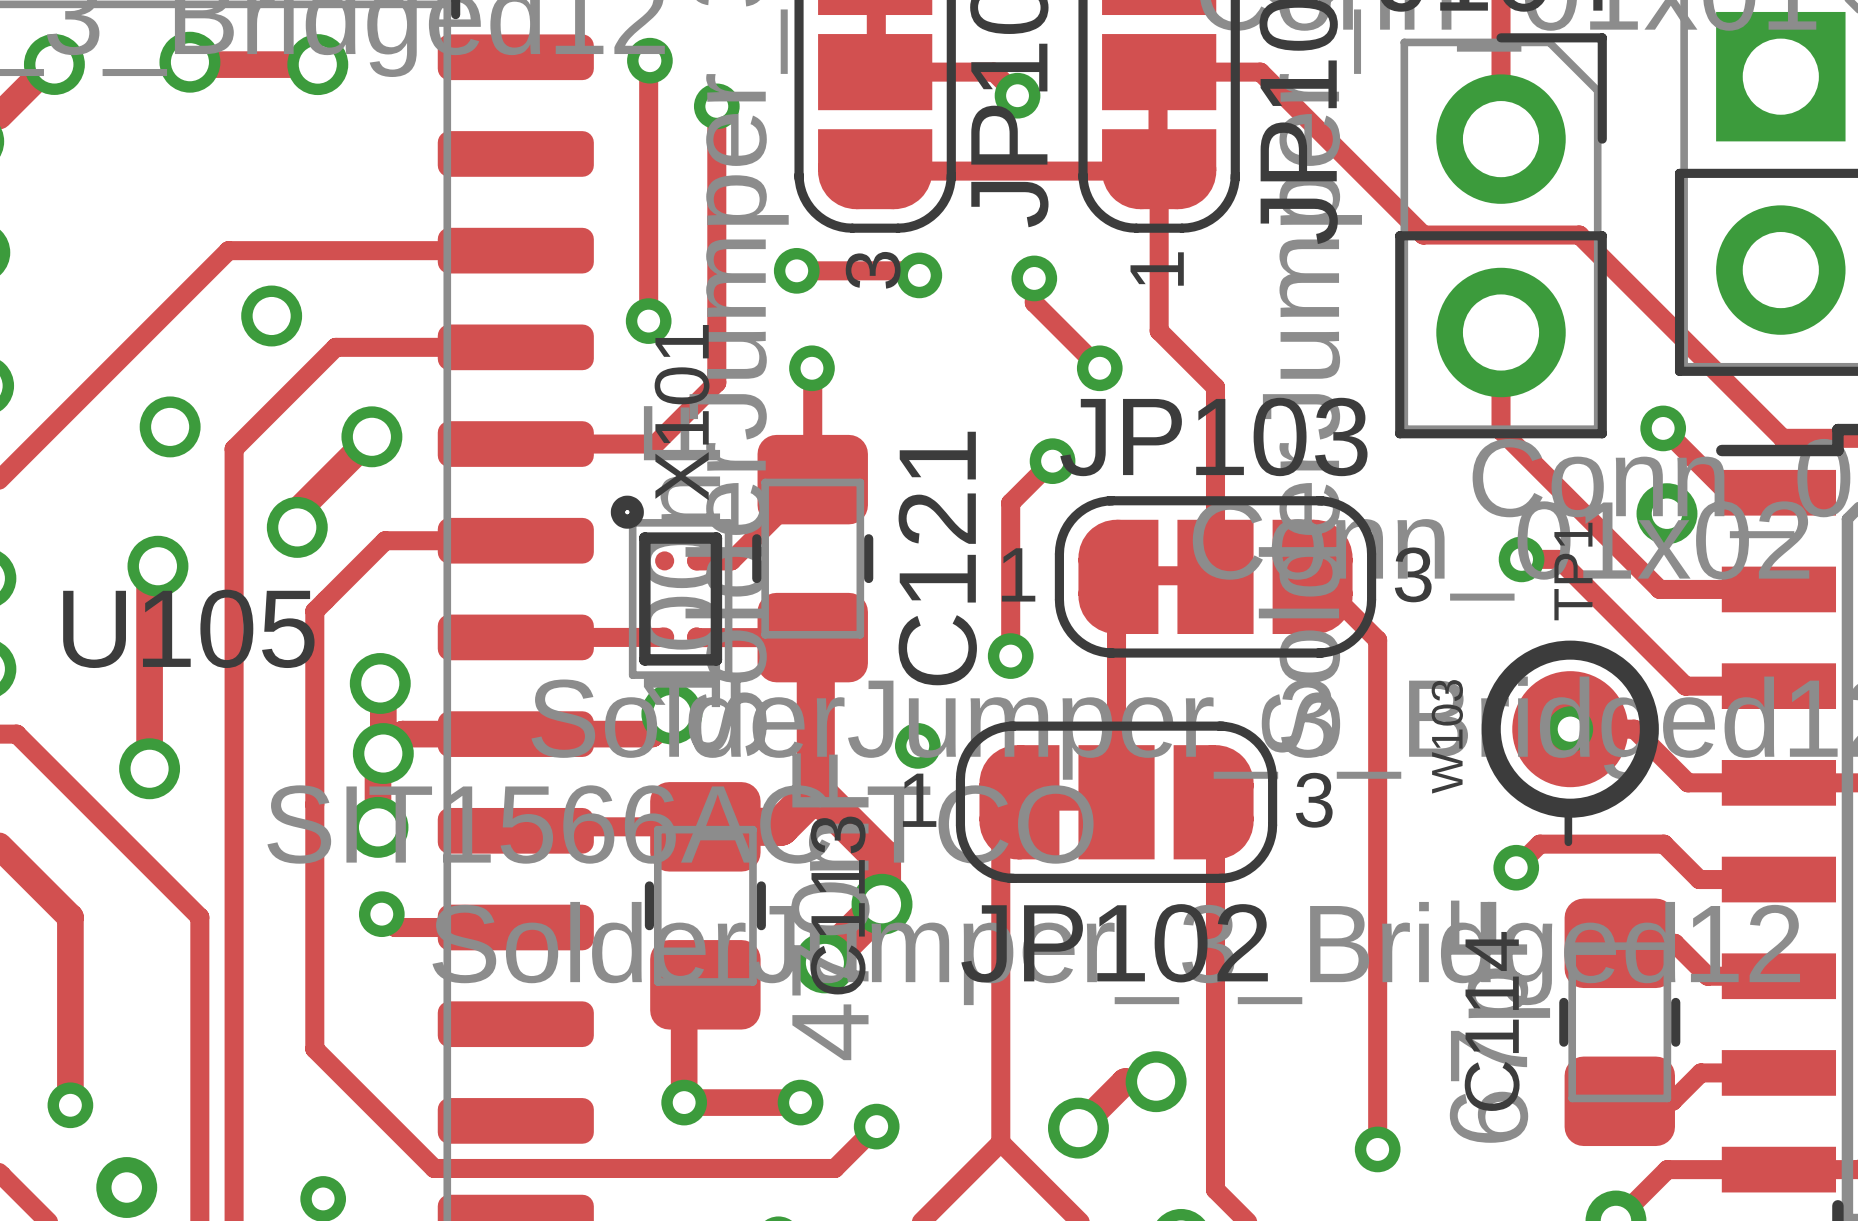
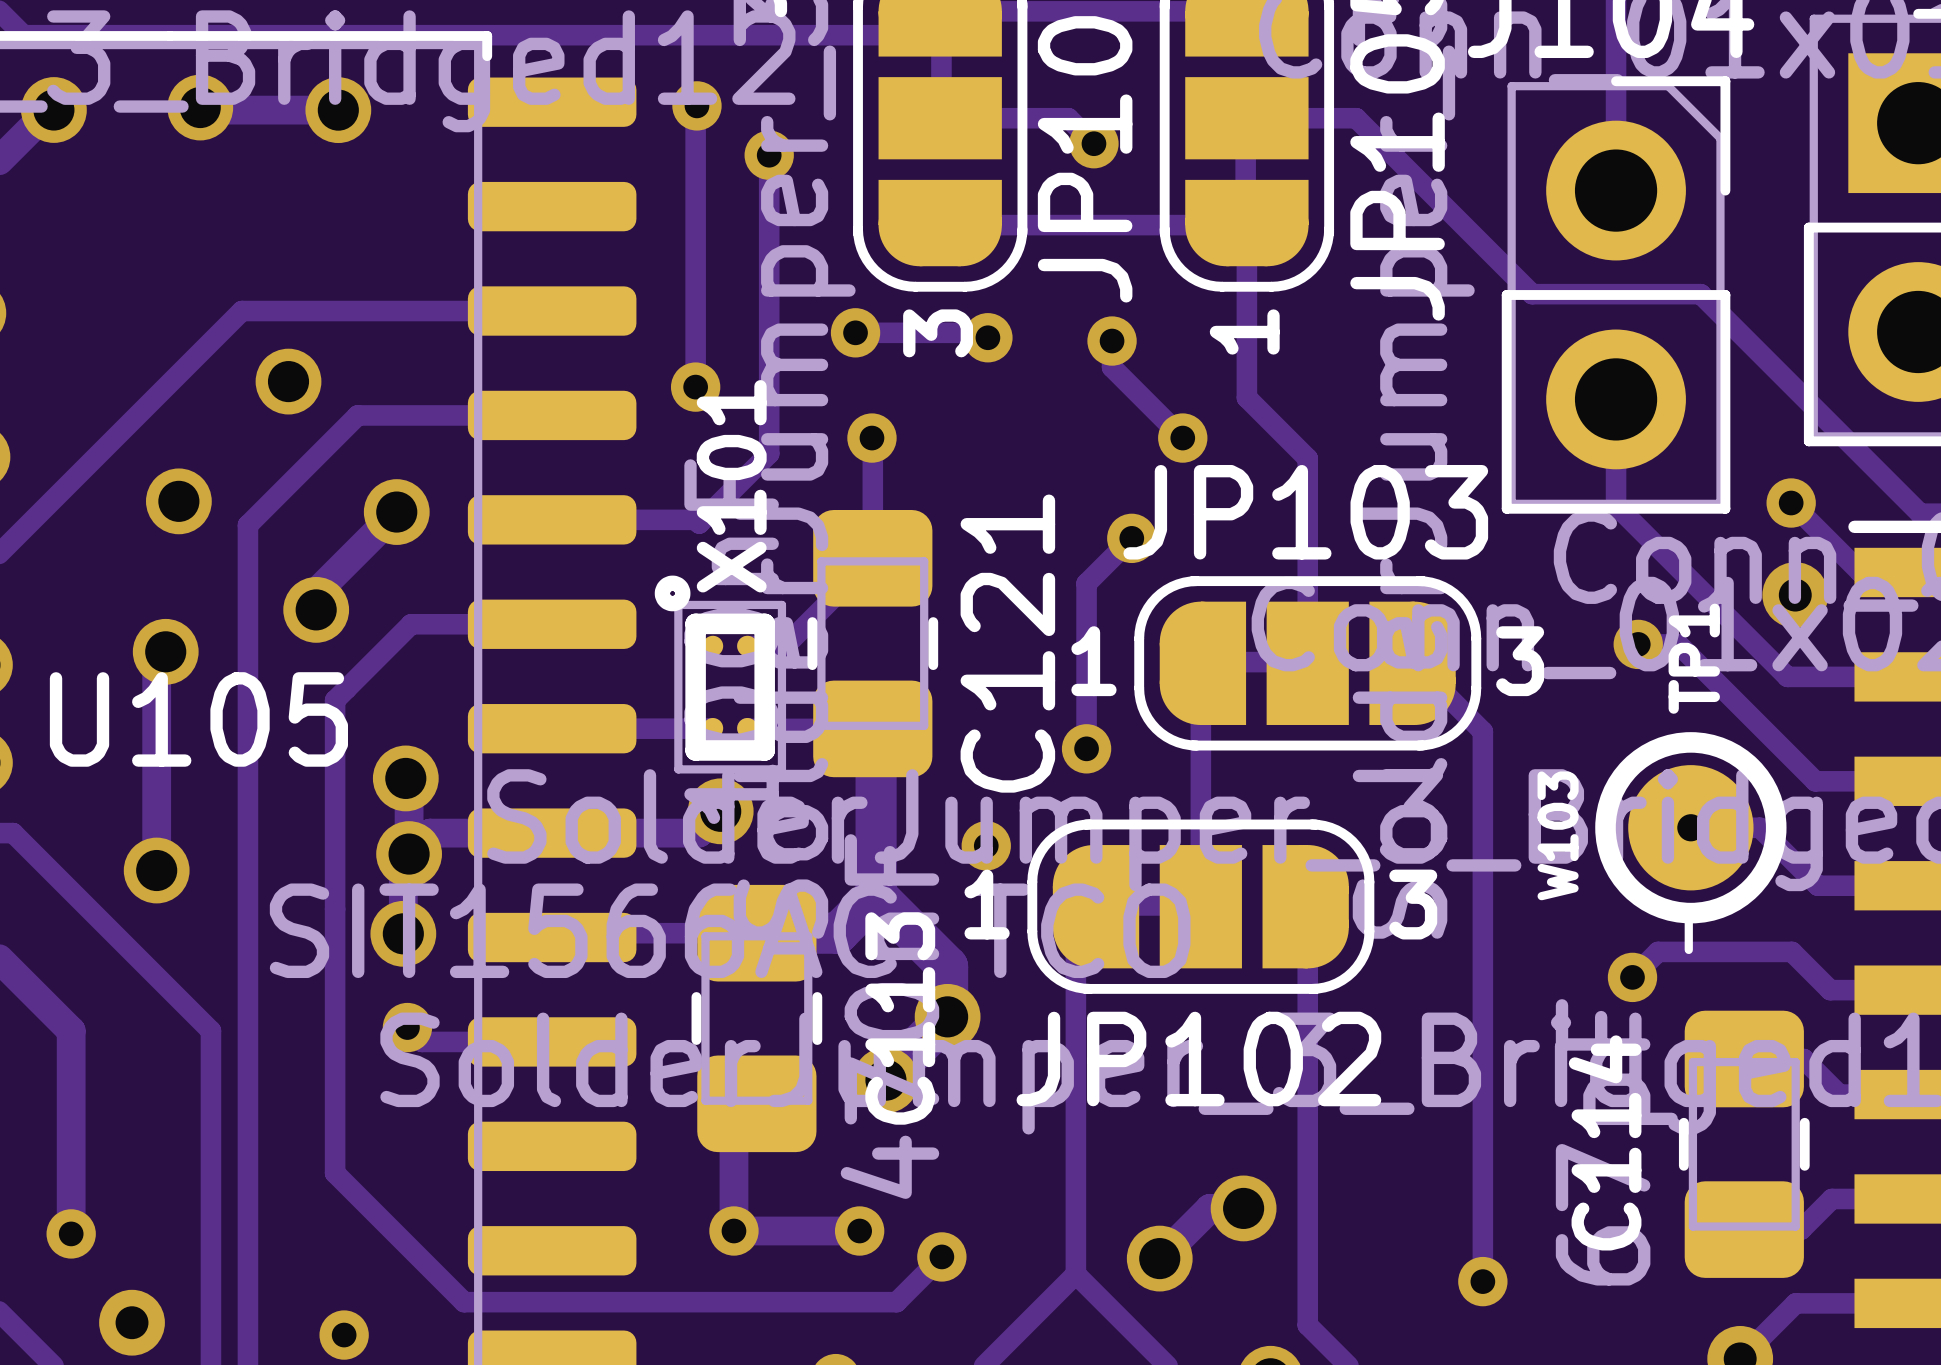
X101 footprint: [610, 495, 733, 679] -> [654, 575, 787, 774]

